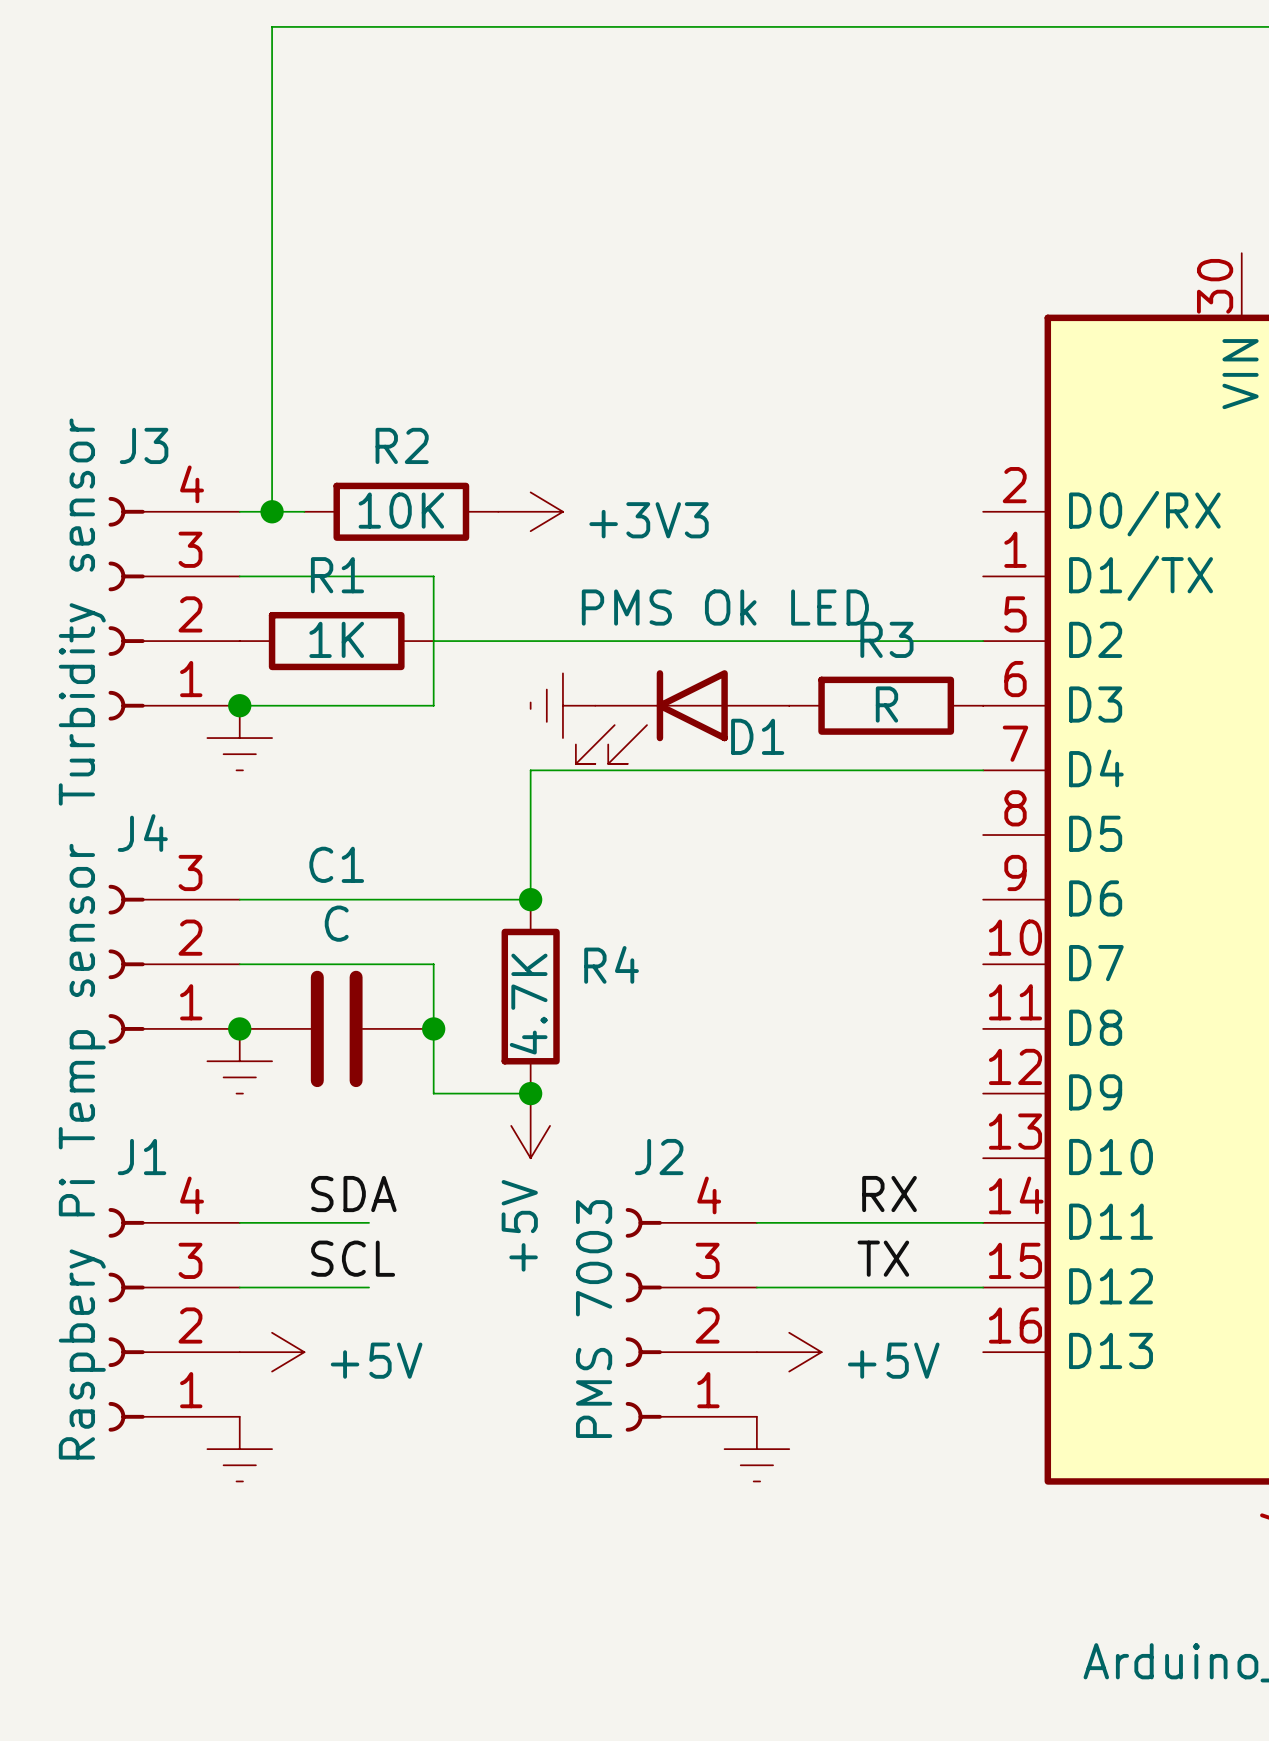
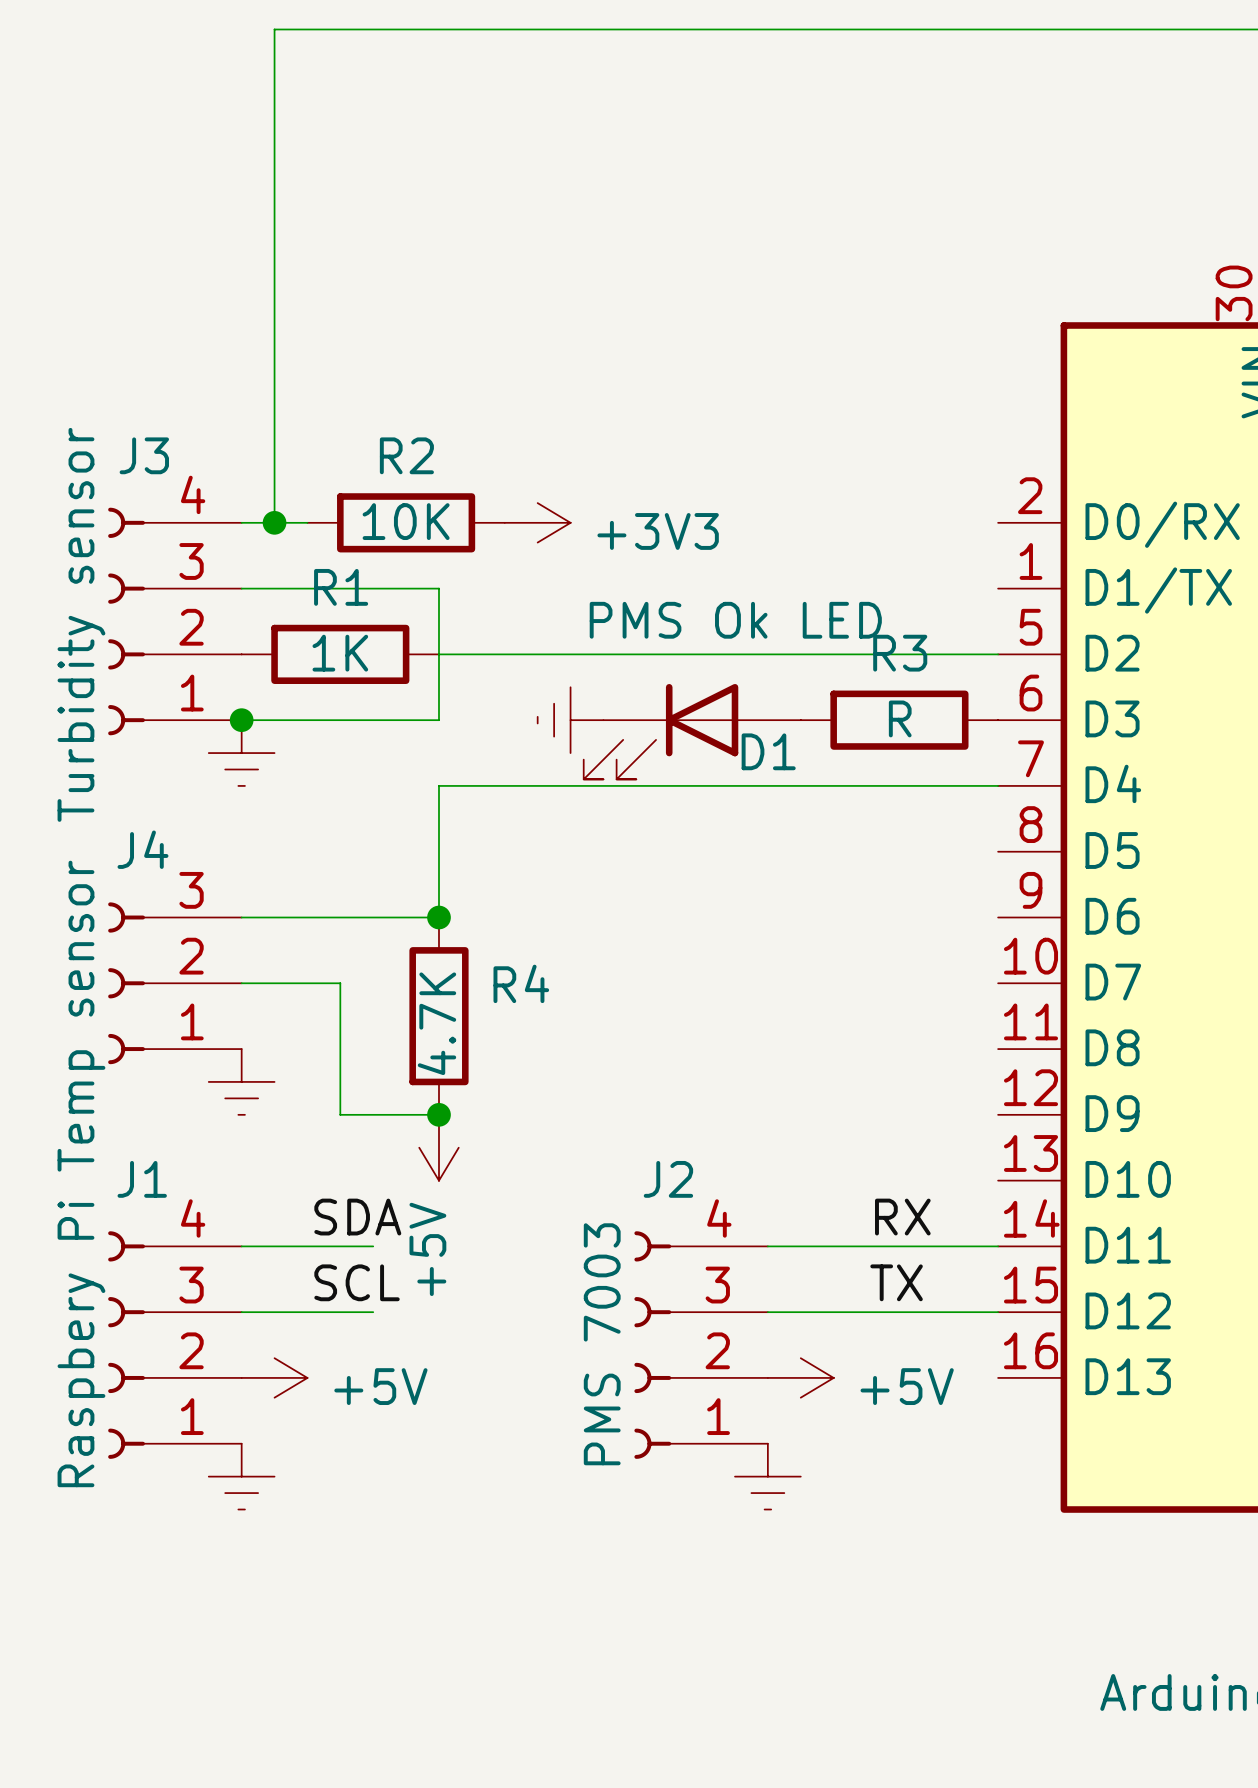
wire: (530, 770) (530, 899) (433, 899) -> (537, 785) (438, 785) (438, 917)
junction: none -> (438, 917)
junction: (530, 899) -> none
wire: (336, 964) (433, 964) (433, 1093) (530, 1093) -> (340, 983) (340, 1114) (438, 1114)
R4 position: (530, 996) -> (438, 1016)
junction: (239, 1028) -> none
C1: C (336, 1028) -> none
junction: (433, 1028) -> none
junction: none -> (438, 1114)
junction: (530, 1093) -> none
power symbol position: +5V (530, 1125) -> +5V (438, 1147)

